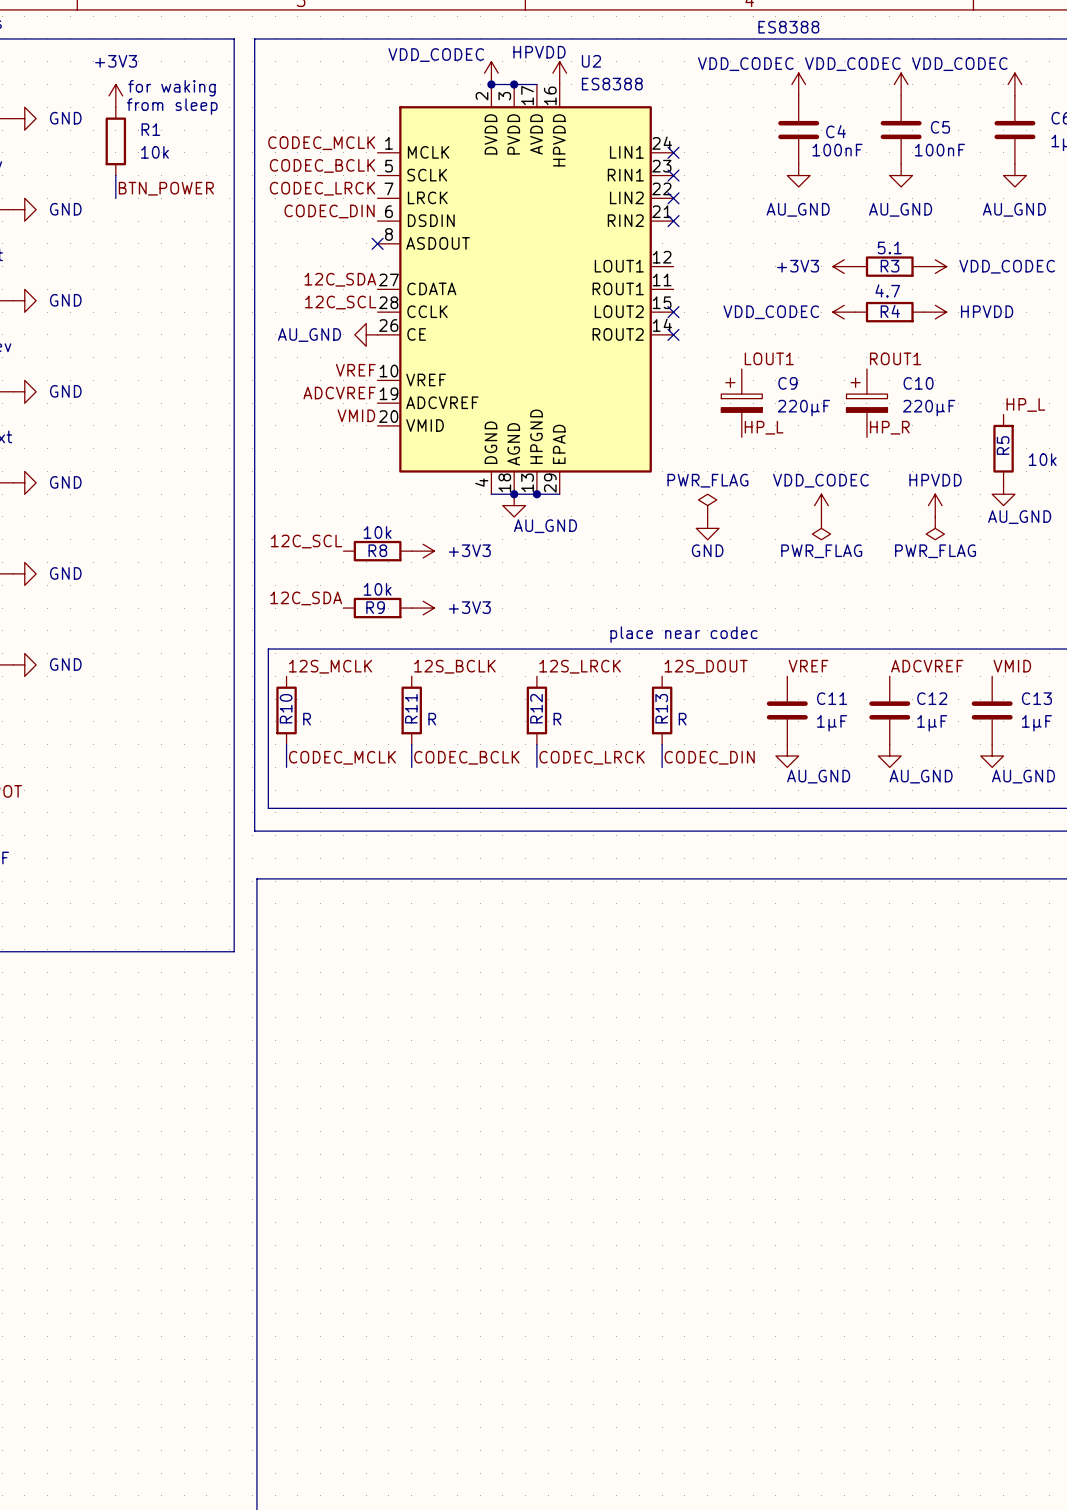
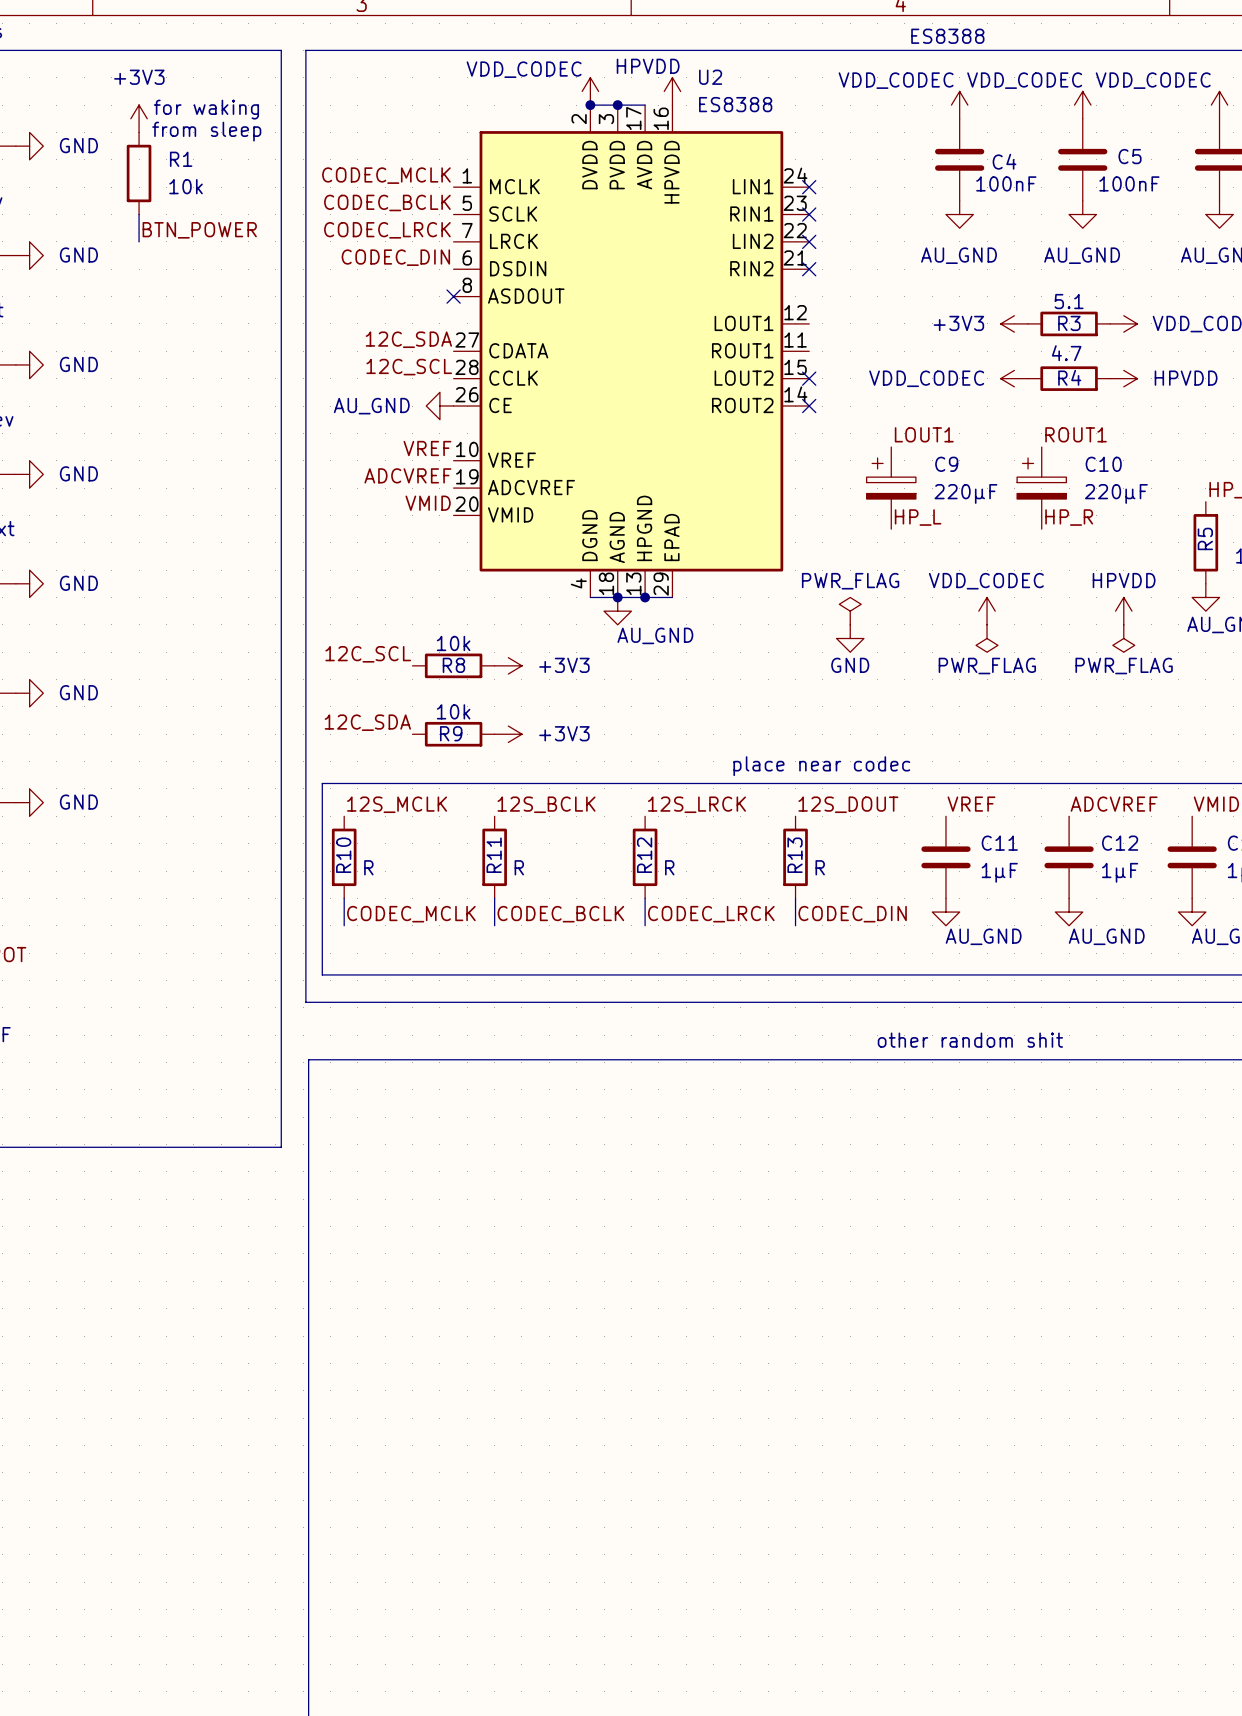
text: none -> other random shit (970, 1040)

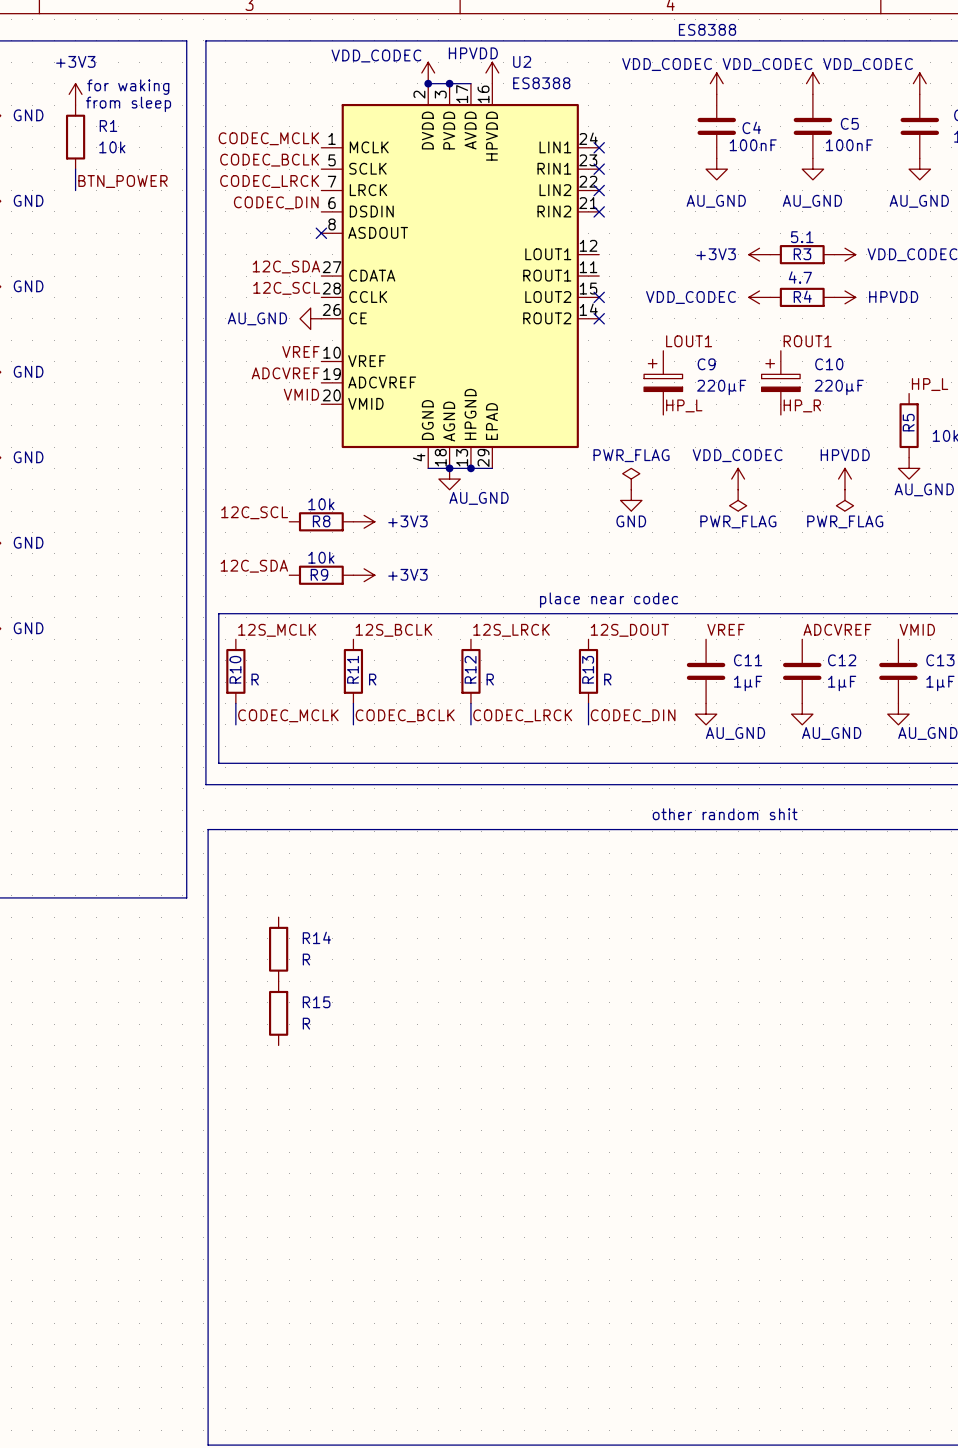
R14: none -> R (278, 949)
R15: none -> R (278, 1013)

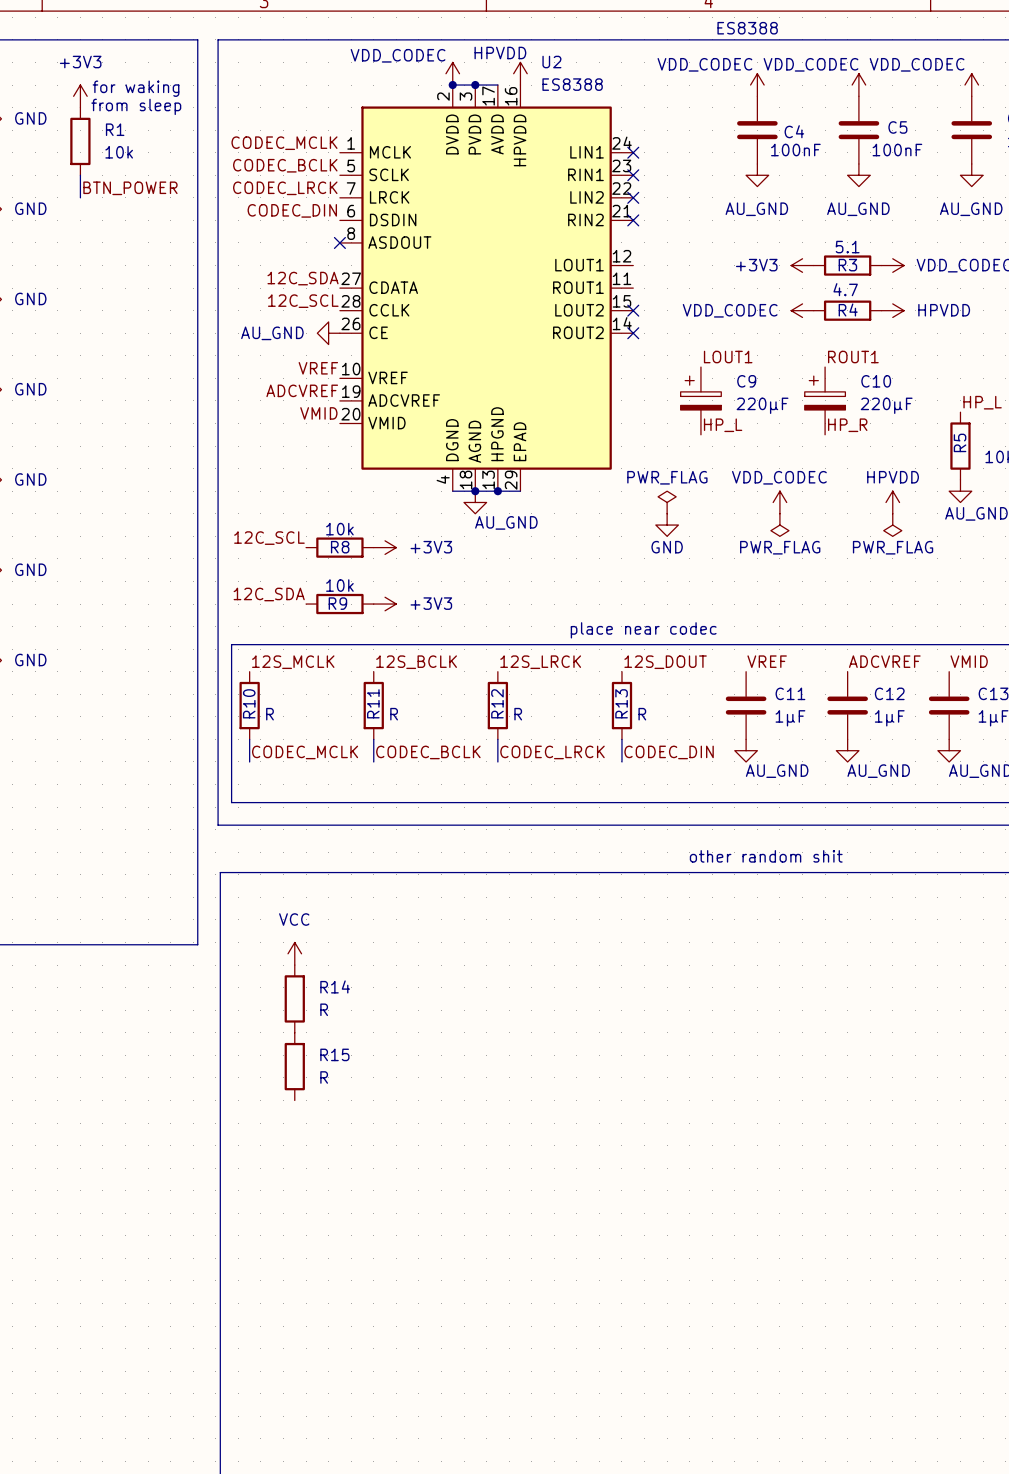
power symbol: none -> VCC (294, 953)

